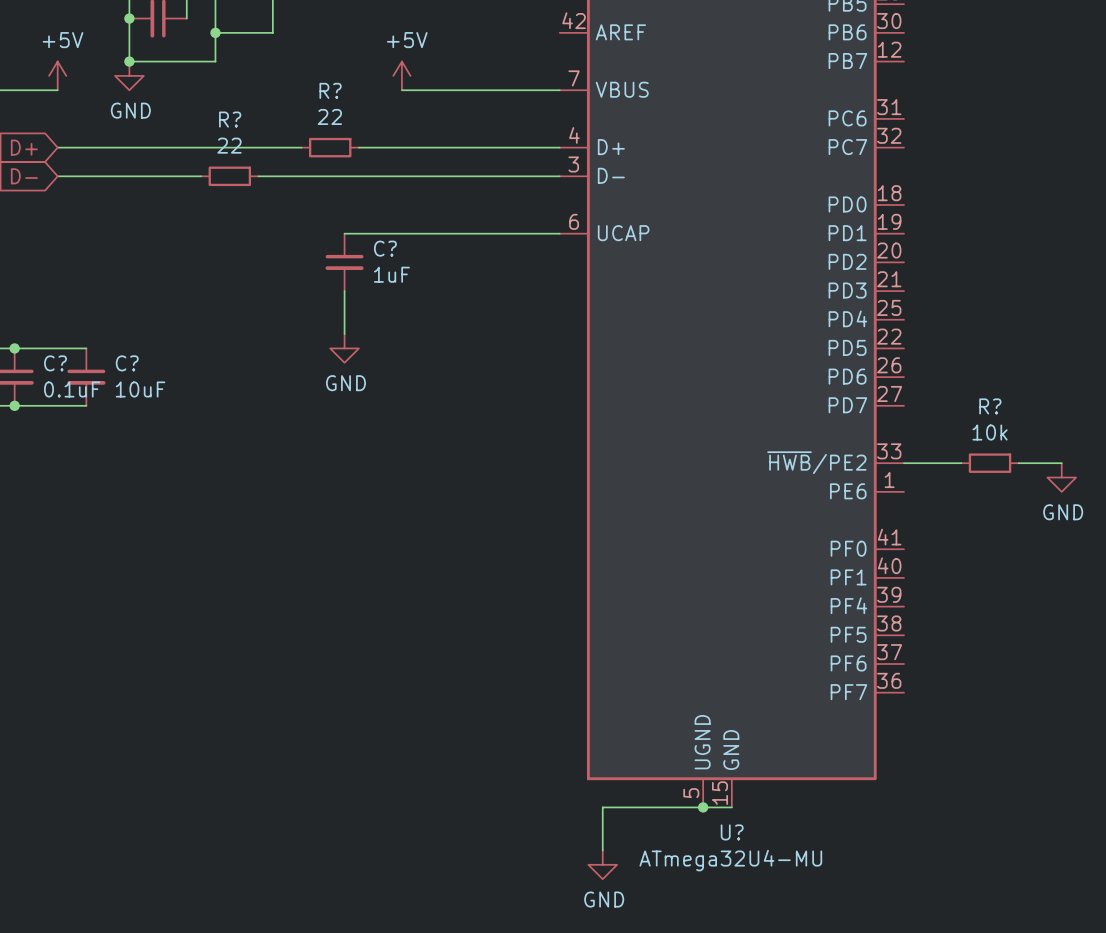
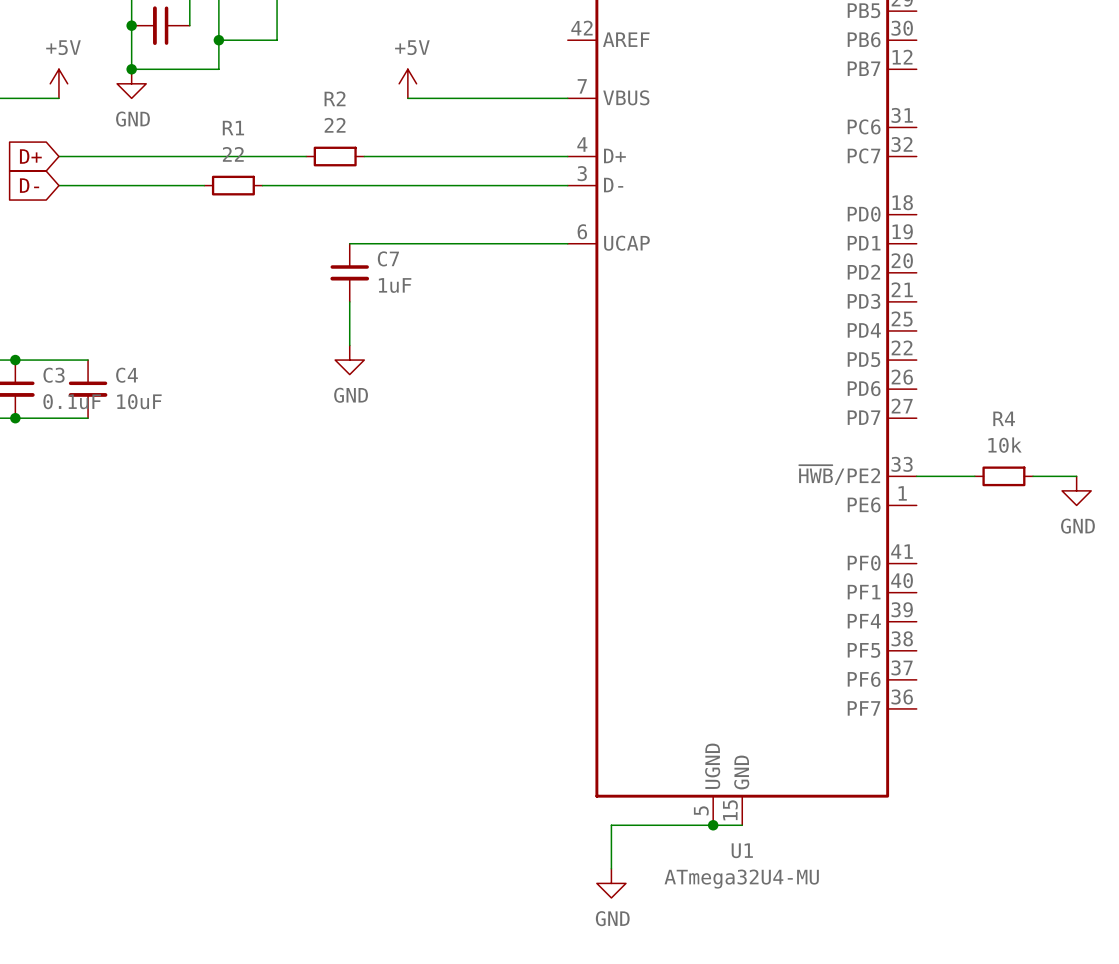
R? name: R? (330, 90) -> R2 (335, 98)
R? name: R? (230, 119) -> R1 (233, 128)
C? name: C? (385, 248) -> C7 (388, 258)
C? name: C? (55, 363) -> C3 (54, 375)
C? name: C? (127, 363) -> C4 (127, 375)
R? name: R? (990, 406) -> R4 (1004, 418)
U? name: U? (732, 832) -> U1 (742, 850)

